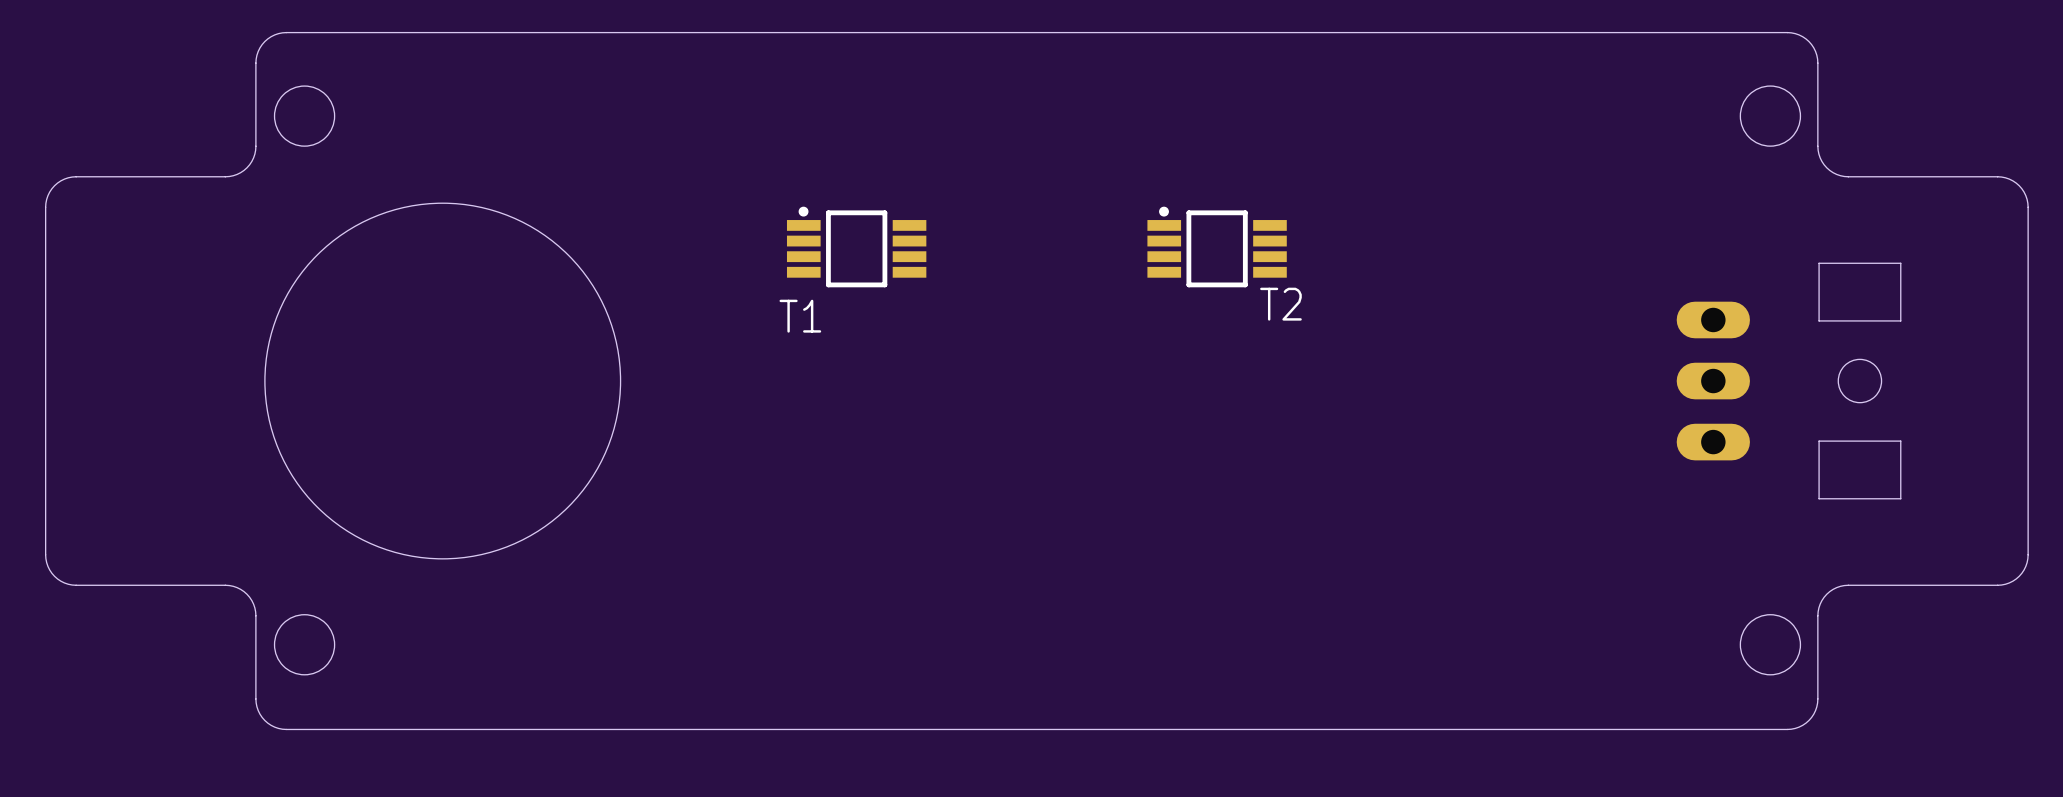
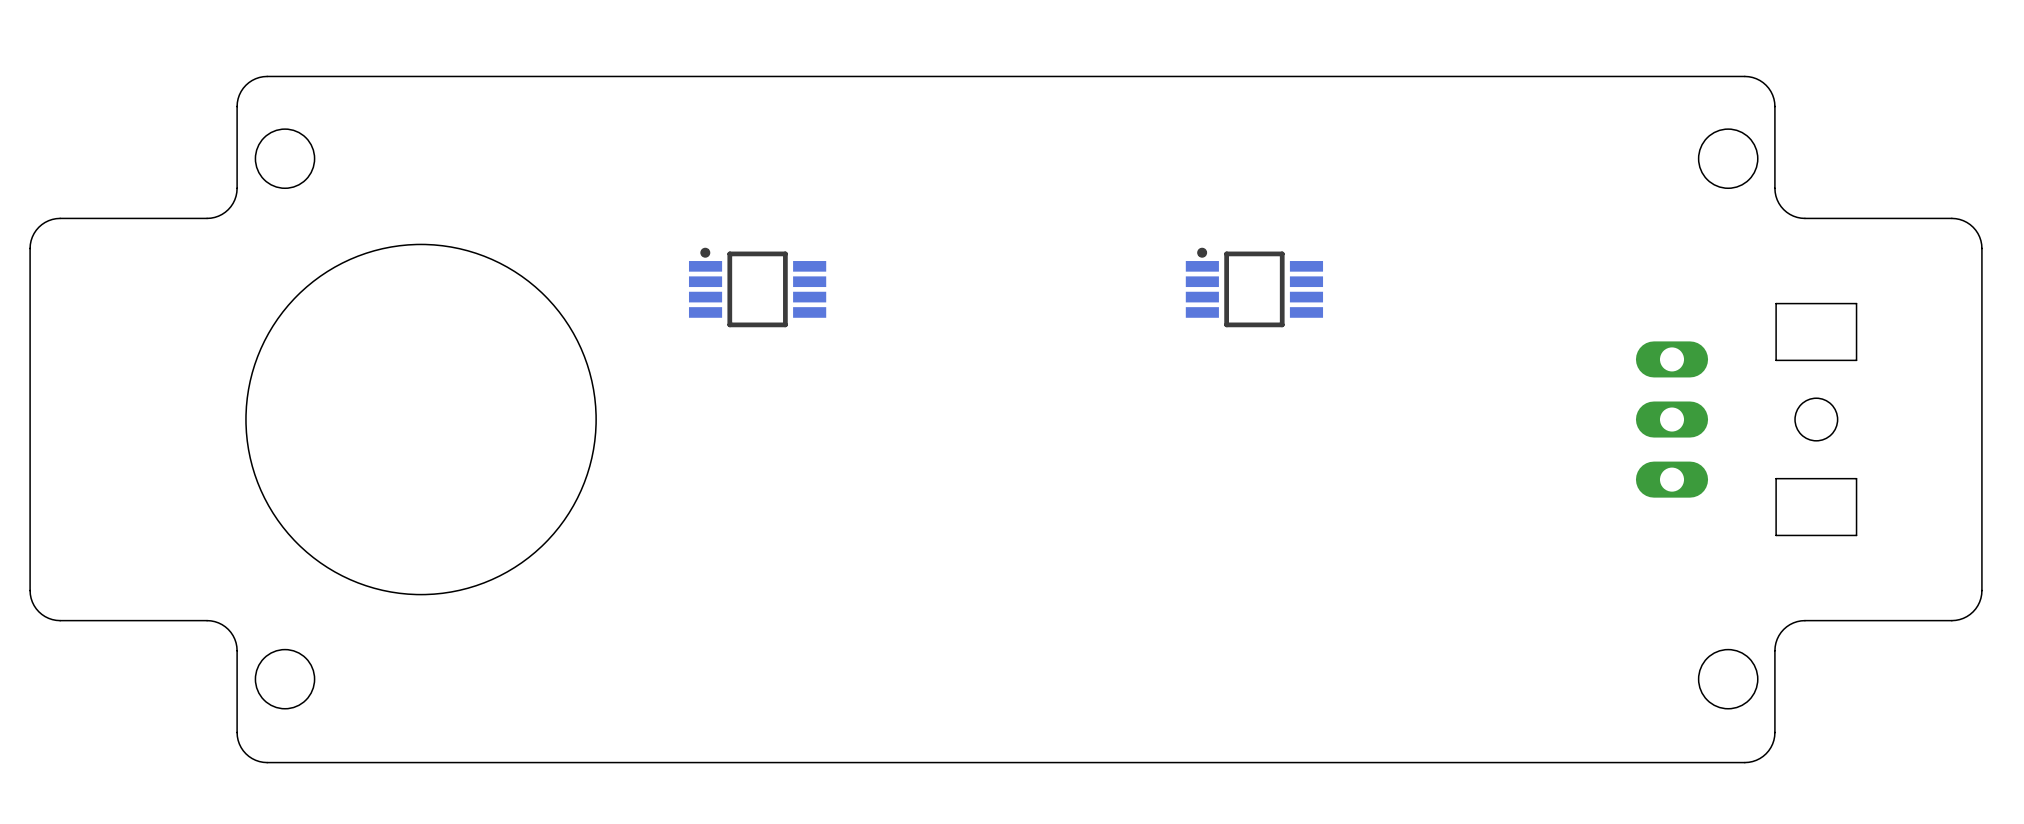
part: none -> (757, 287)
T1: (856, 247) -> none
T2: (1217, 247) -> none
part: none -> (1254, 287)

